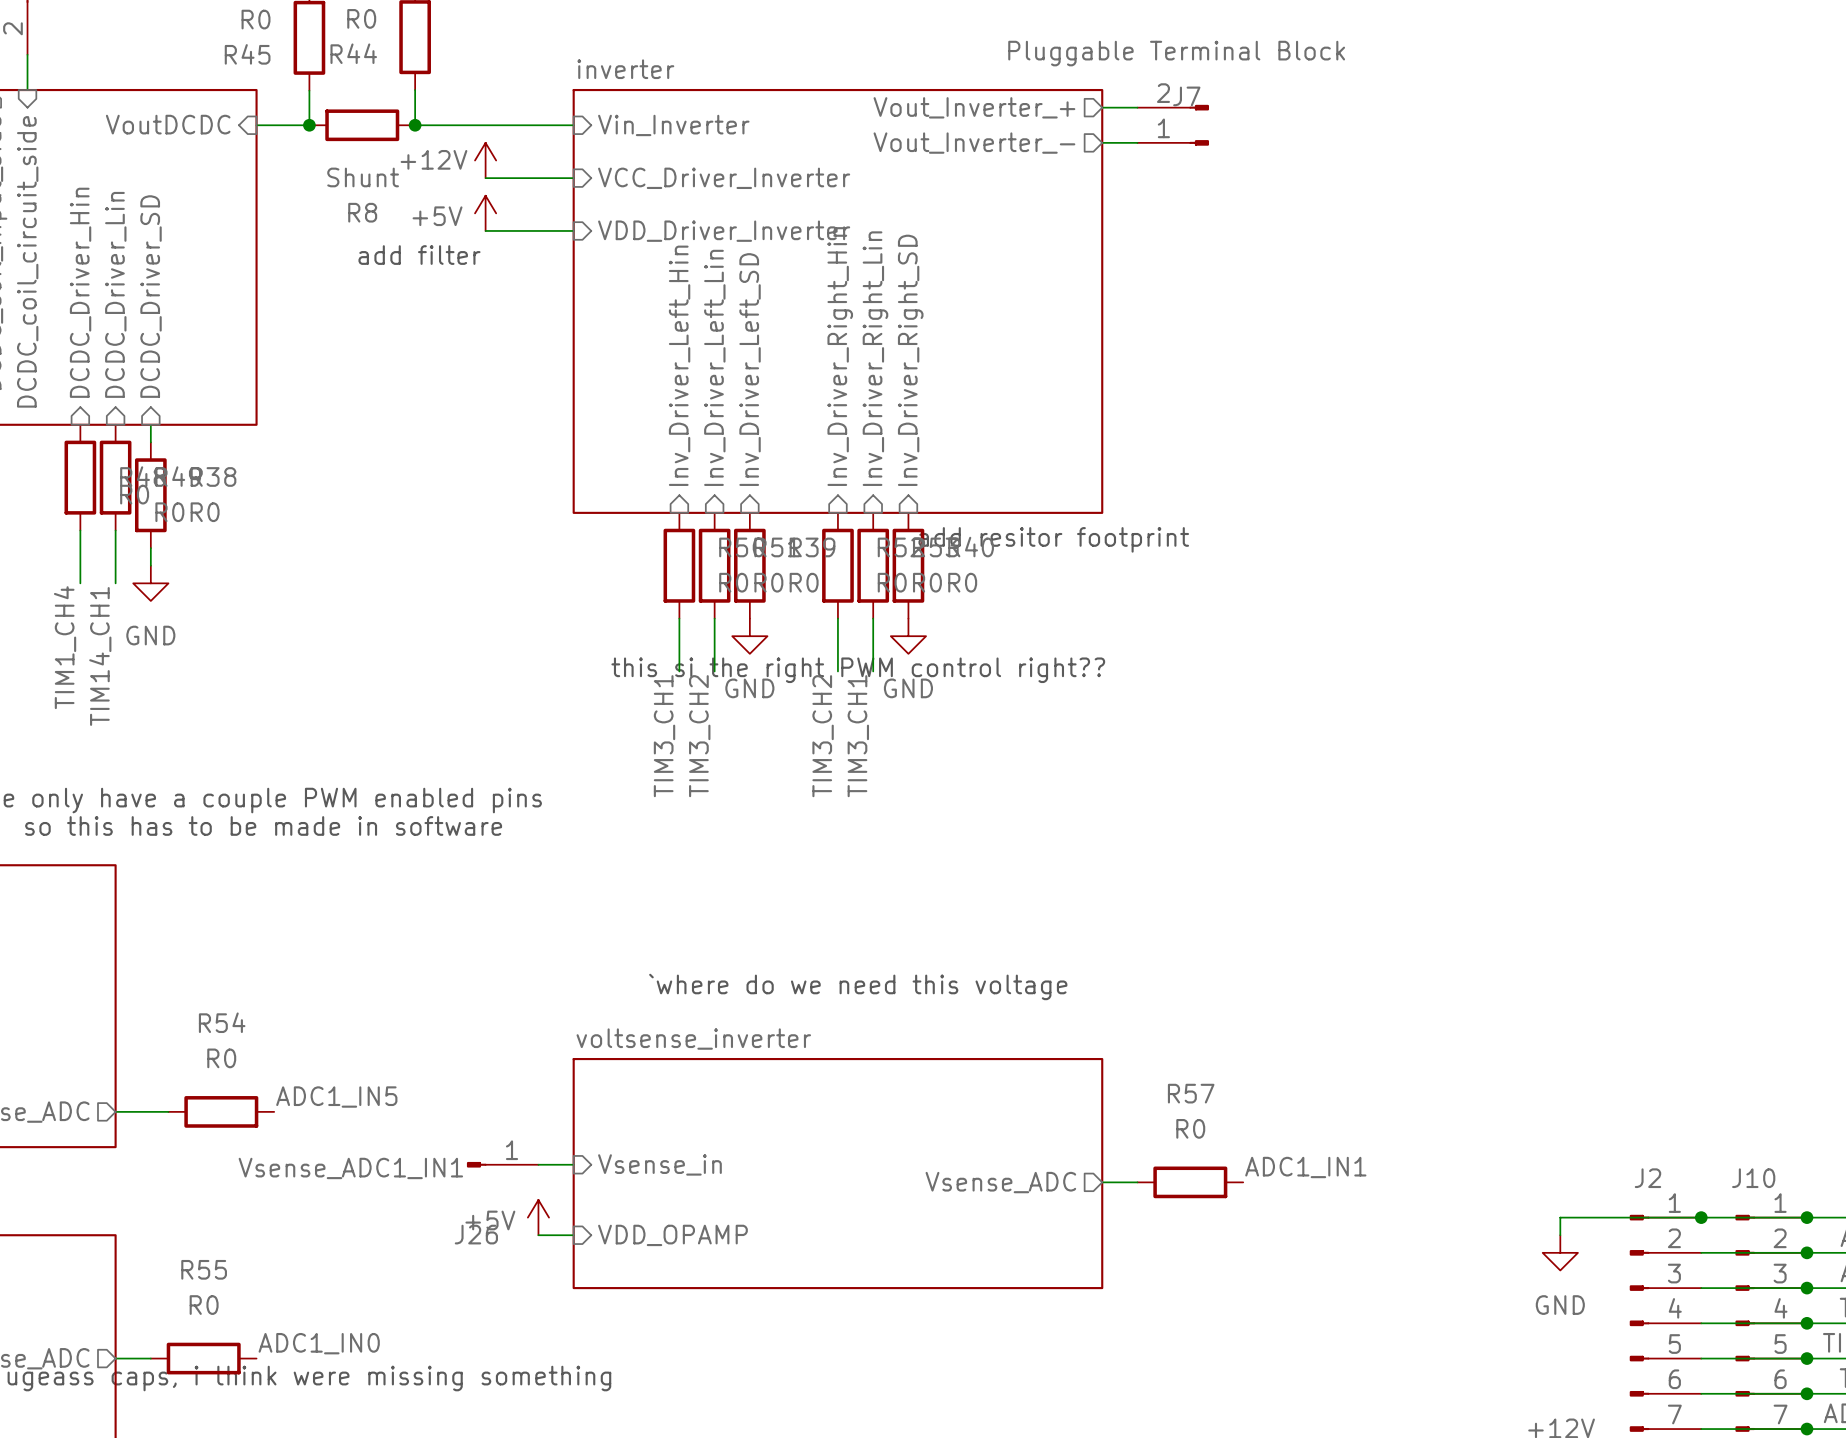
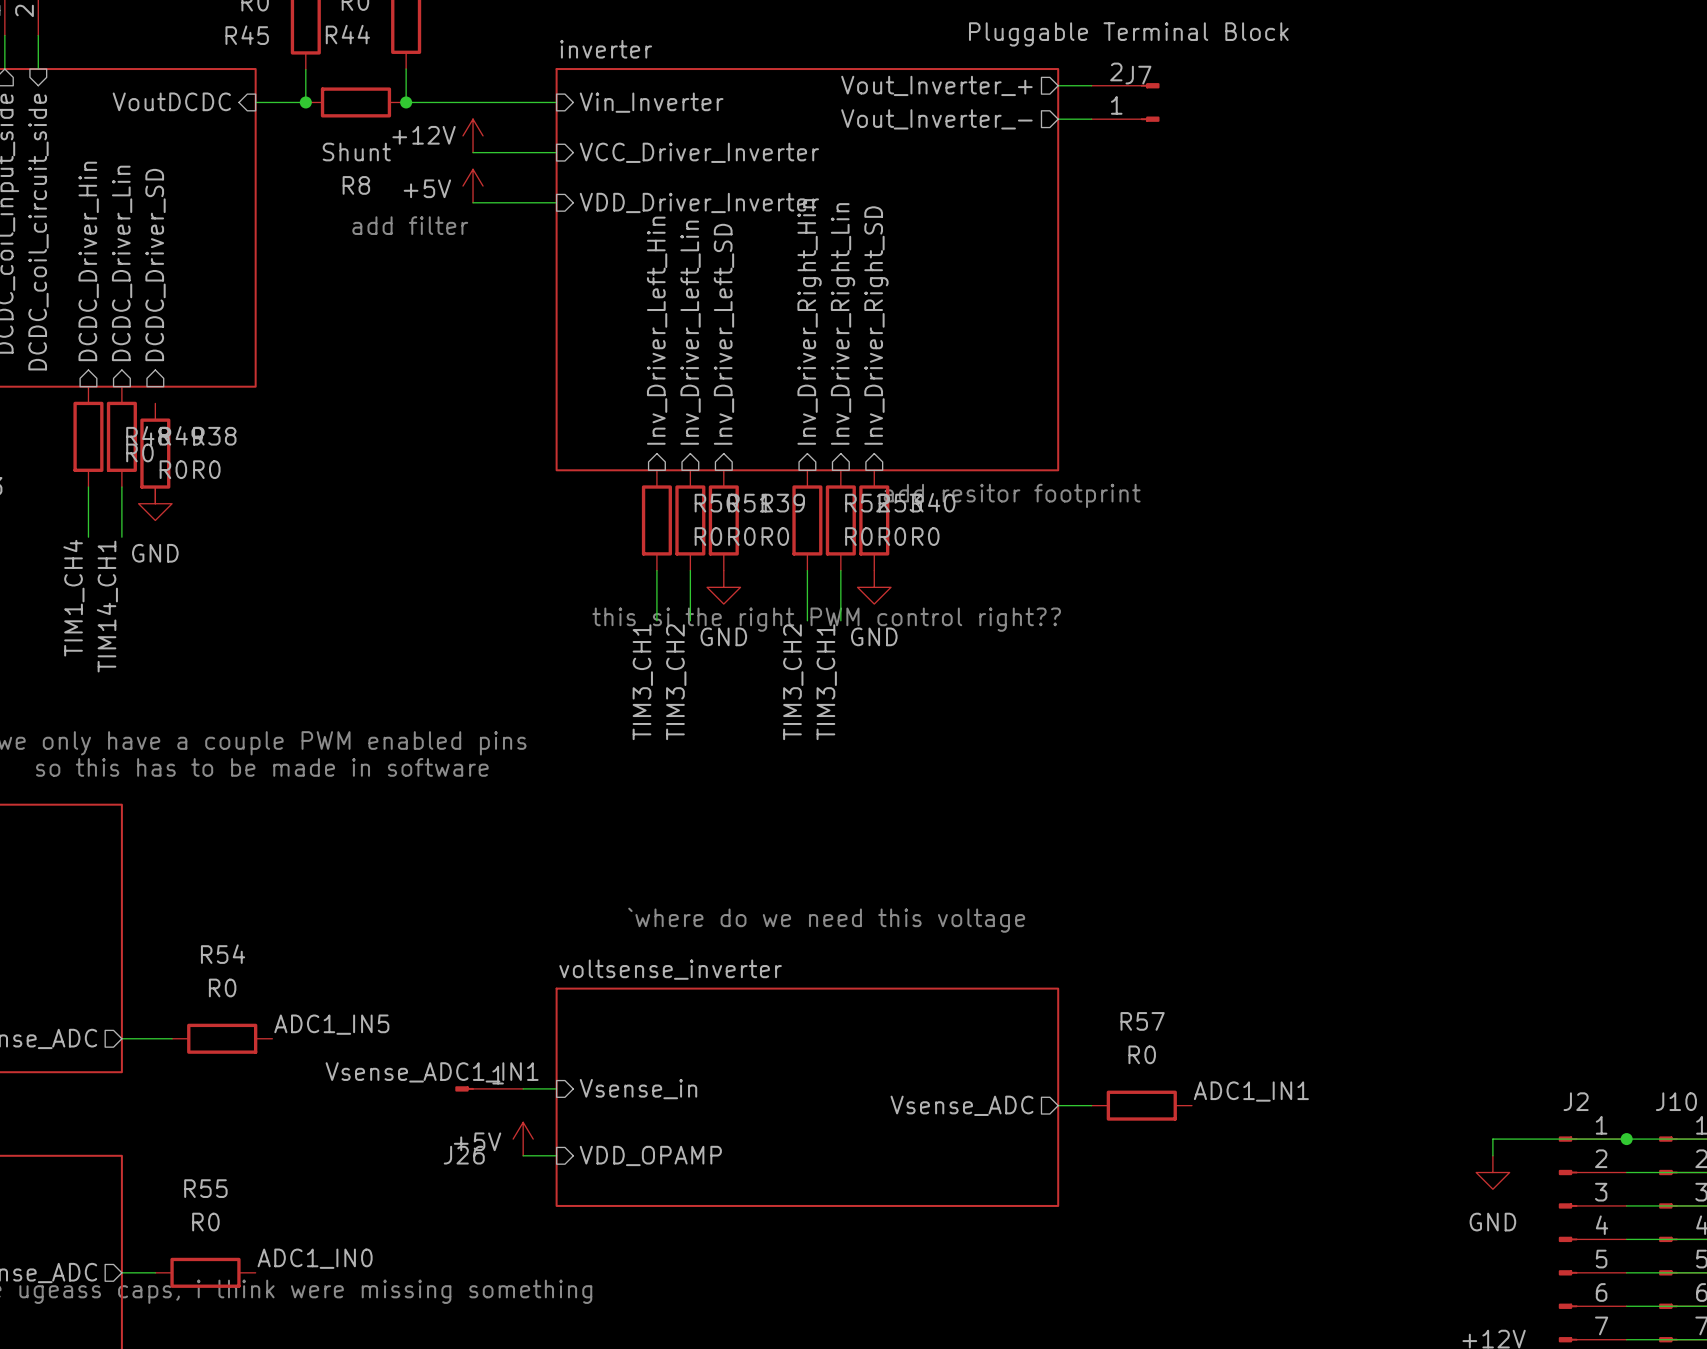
wire: (150, 424) (150, 442) -> none
wire: (150, 548) (150, 565) -> none
power symbol position: GND (150, 583) -> GND (155, 503)
J26 value position: Vsense_ADC1_IN1 (350, 1168) -> Vsense_ADC1_IN1 (432, 1072)

